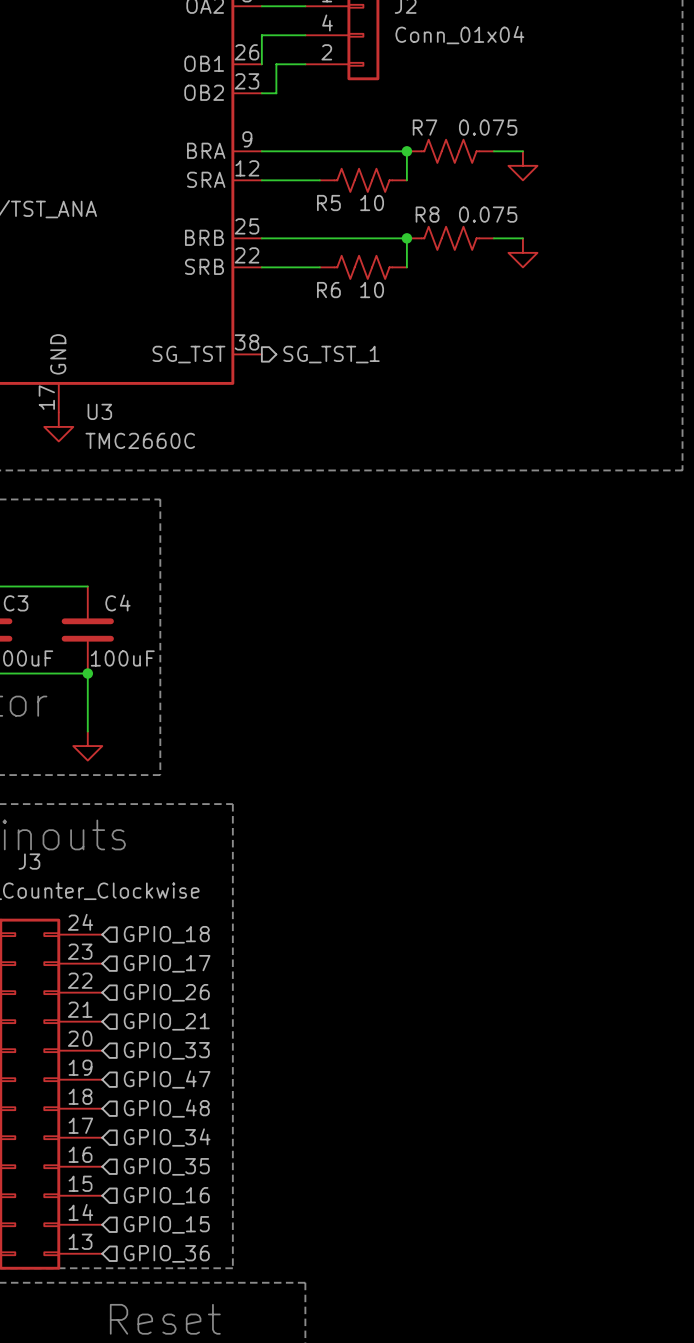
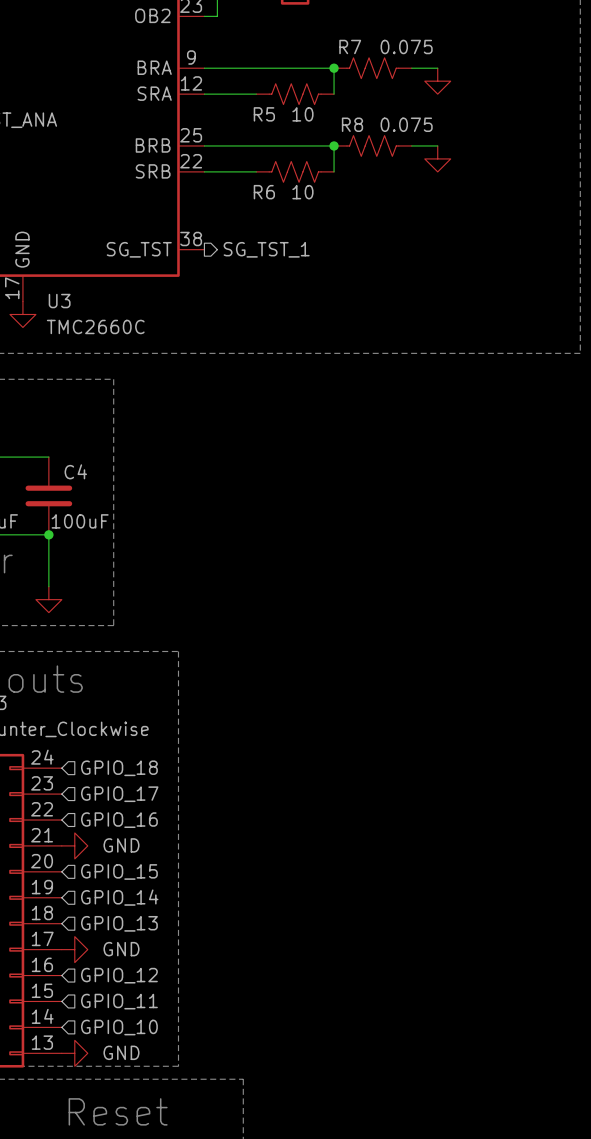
hierarchical label: GPIO_26 (166, 992) -> GPIO_16 (119, 820)
power symbol: none -> GND (74, 845)
hierarchical label: GPIO_21 (166, 1021) -> none
hierarchical label: GPIO_33 (166, 1050) -> GPIO_15 (119, 871)
hierarchical label: GPIO_47 (167, 1079) -> GPIO_14 (119, 897)
hierarchical label: GPIO_48 (166, 1108) -> GPIO_13 (119, 923)
power symbol: none -> GND (74, 949)
hierarchical label: GPIO_34 (167, 1137) -> none
hierarchical label: GPIO_35 (166, 1166) -> GPIO_12 (119, 975)
hierarchical label: GPIO_16 (166, 1195) -> GPIO_11 (119, 1001)
hierarchical label: GPIO_15 (166, 1224) -> GPIO_10 (119, 1027)
power symbol: none -> GND (74, 1053)
hierarchical label: GPIO_36 (166, 1253) -> none

